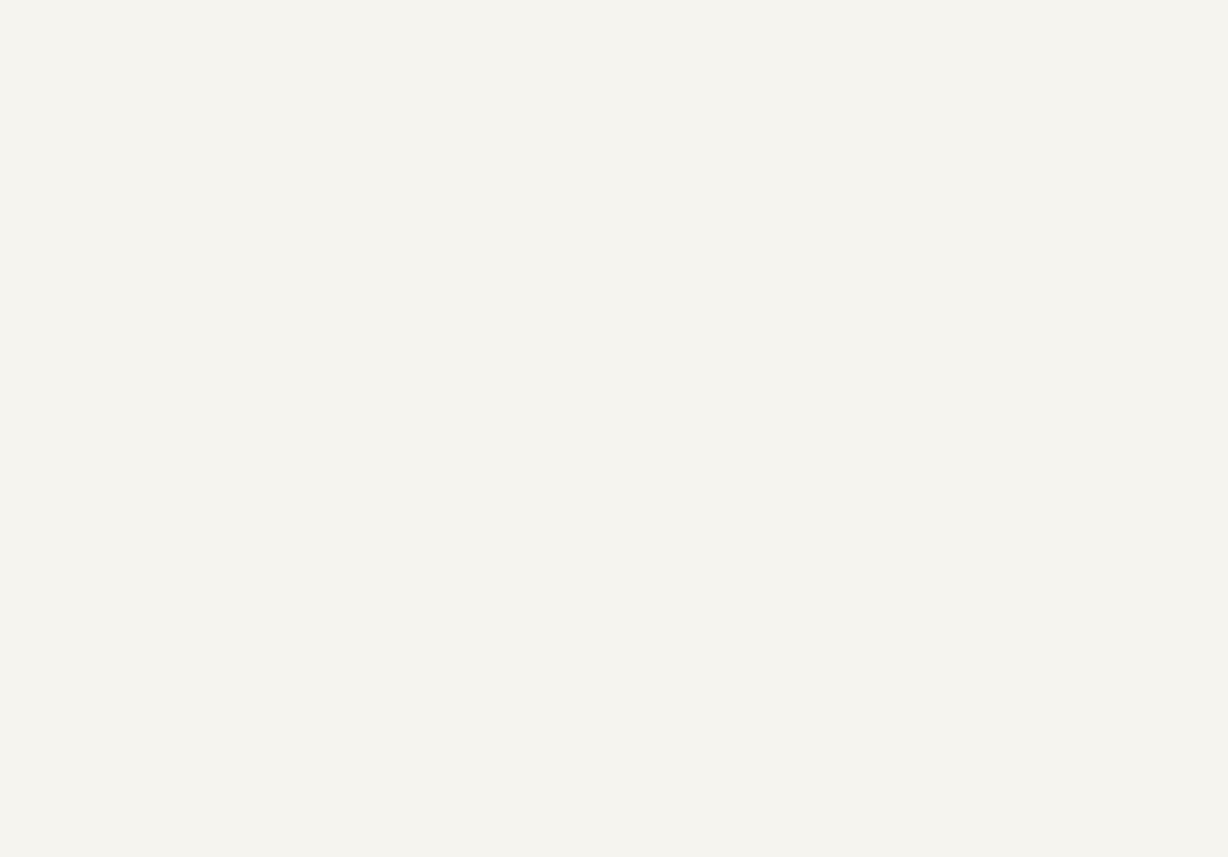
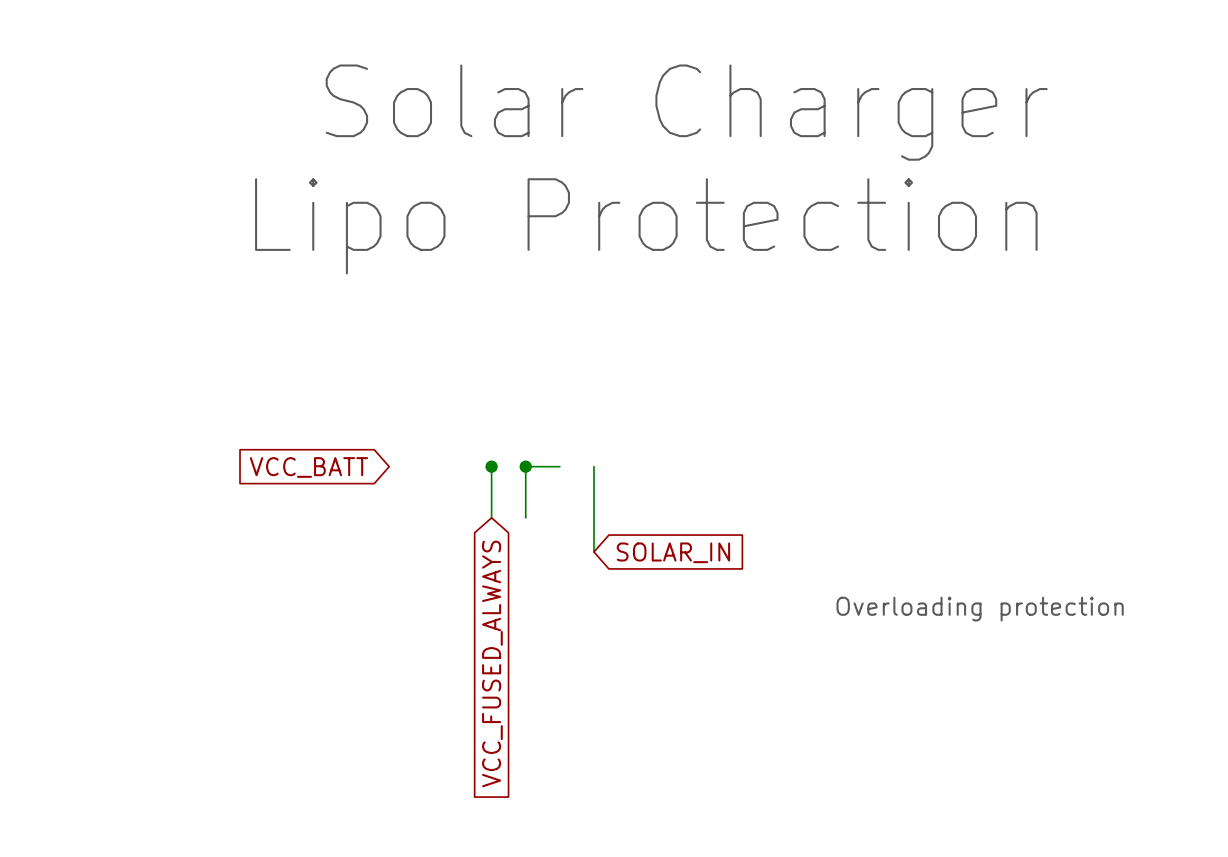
text: none -> Solar Charger (686, 112)
text: none -> Lipo Protection (646, 226)
global label: none -> VCC_BATT (308, 467)
wire: none -> (491, 466) (491, 517)
junction: none -> (491, 466)
junction: none -> (525, 466)
wire: none -> (559, 466) (525, 466) (525, 517)
wire: none -> (593, 466) (593, 551)
global label: none -> SOLAR_IN (673, 552)
text: none -> Overloading protection (980, 609)
global label: none -> VCC_FUSED_ALWAYS (492, 663)

